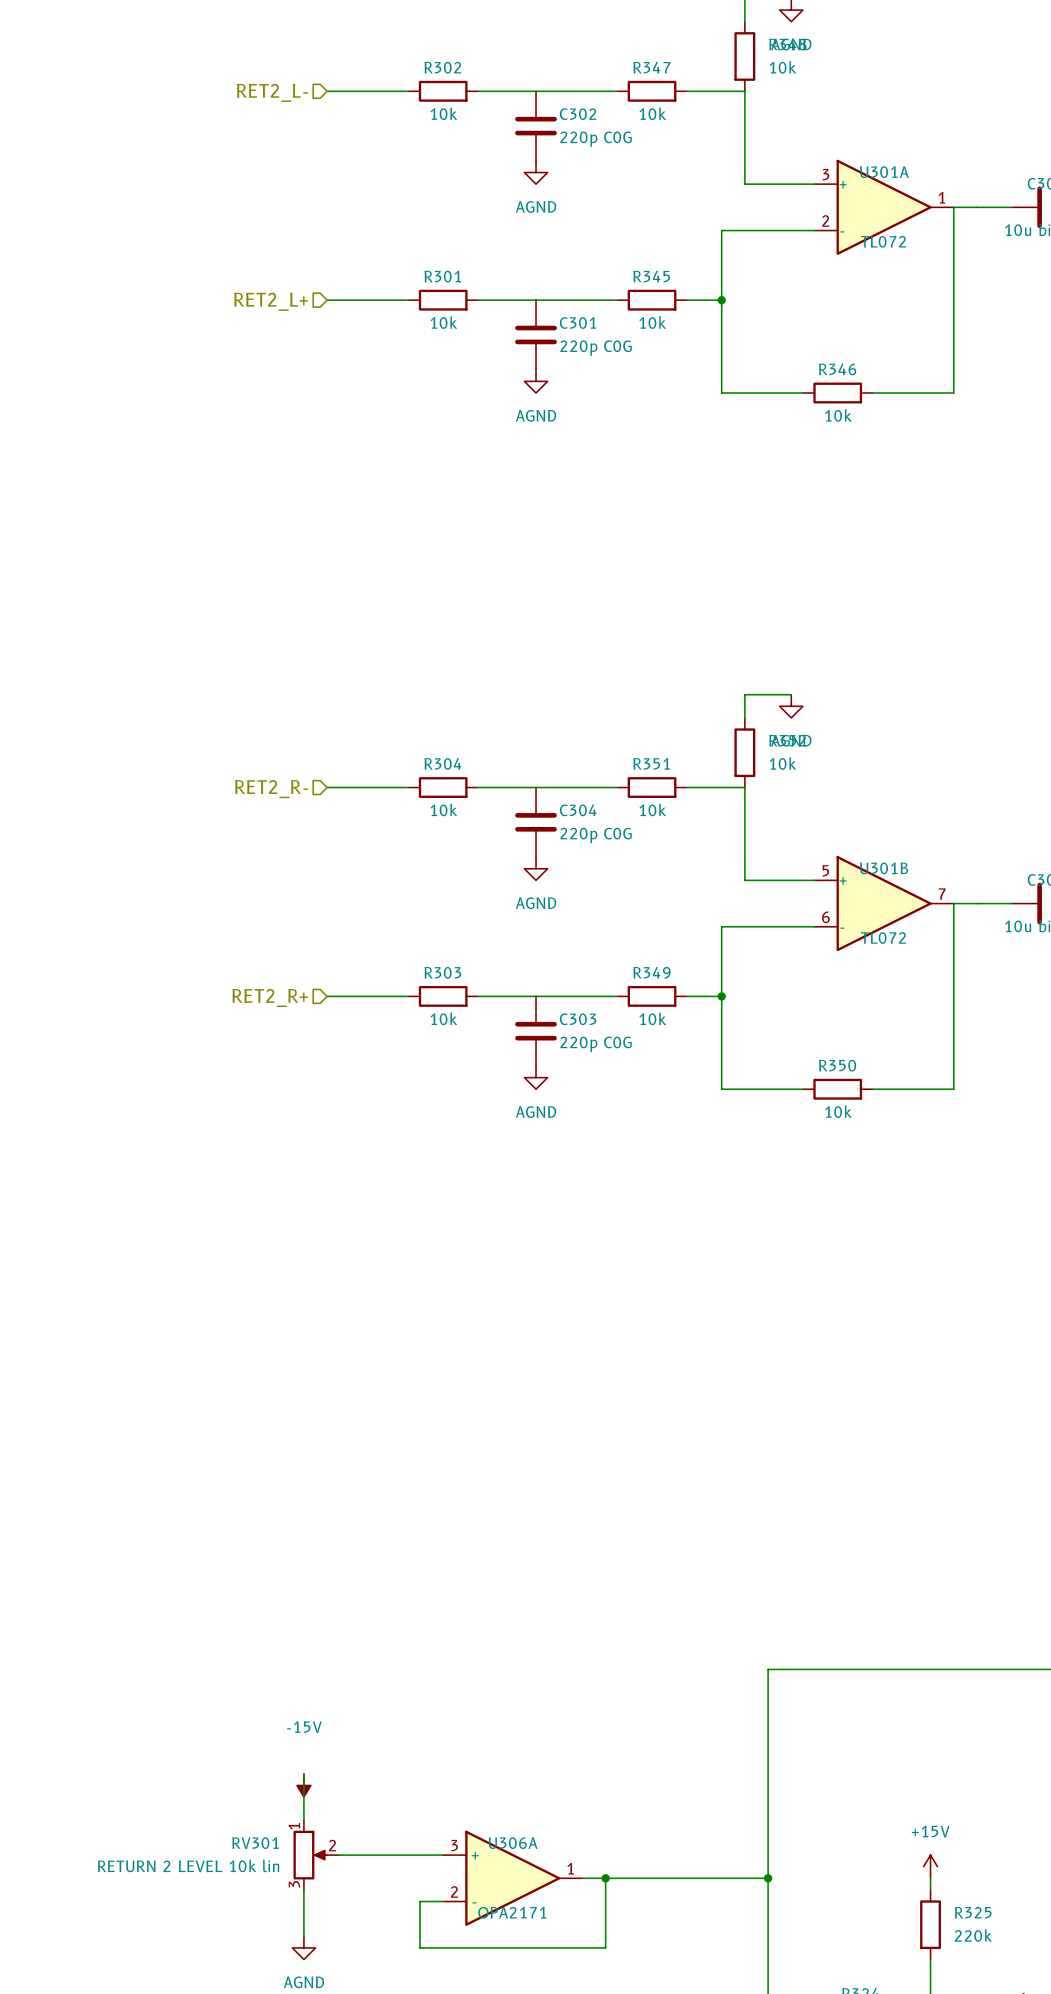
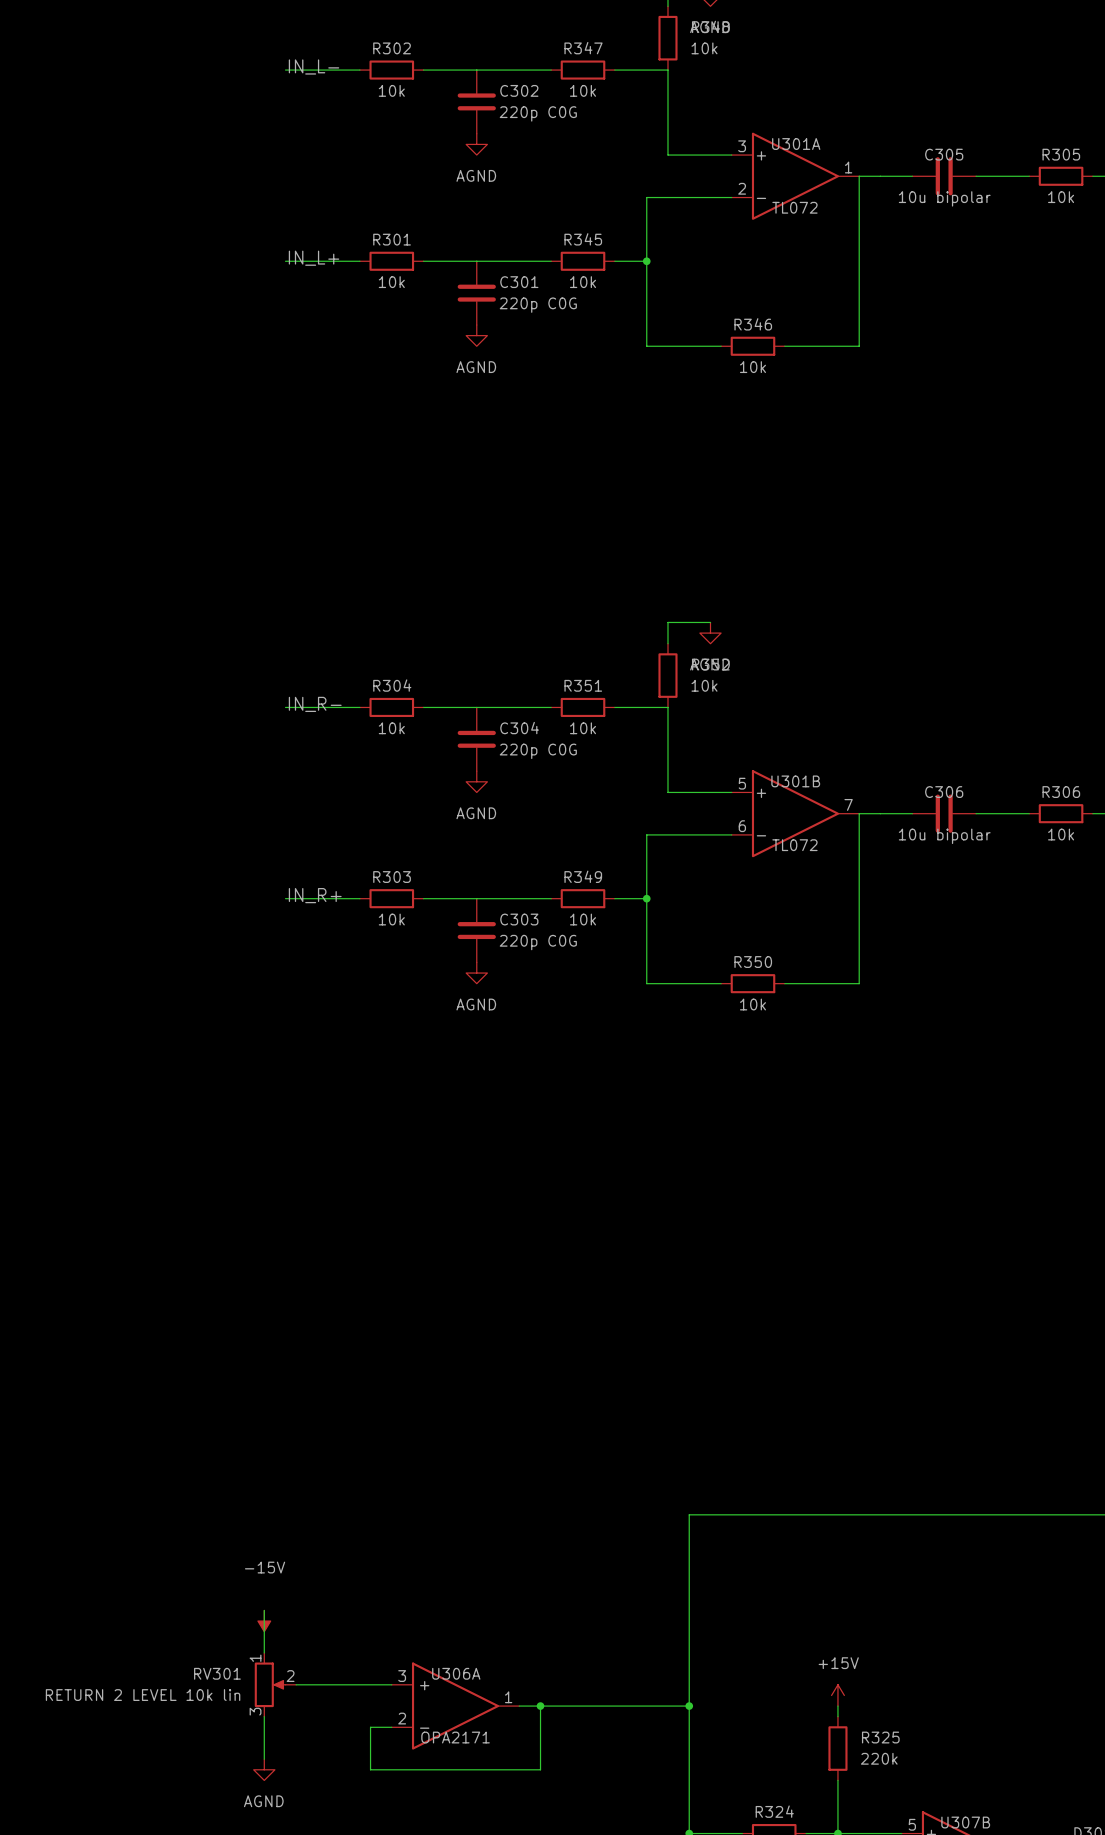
label: none -> IN_L- (314, 66)
hierarchical label: RET2_L- (272, 92) -> none
label: none -> IN_L+ (314, 258)
hierarchical label: RET2_L+ (271, 301) -> none
label: none -> IN_R- (315, 704)
hierarchical label: RET2_R- (271, 789) -> none
label: none -> IN_R+ (315, 895)
hierarchical label: RET2_R+ (270, 997) -> none

